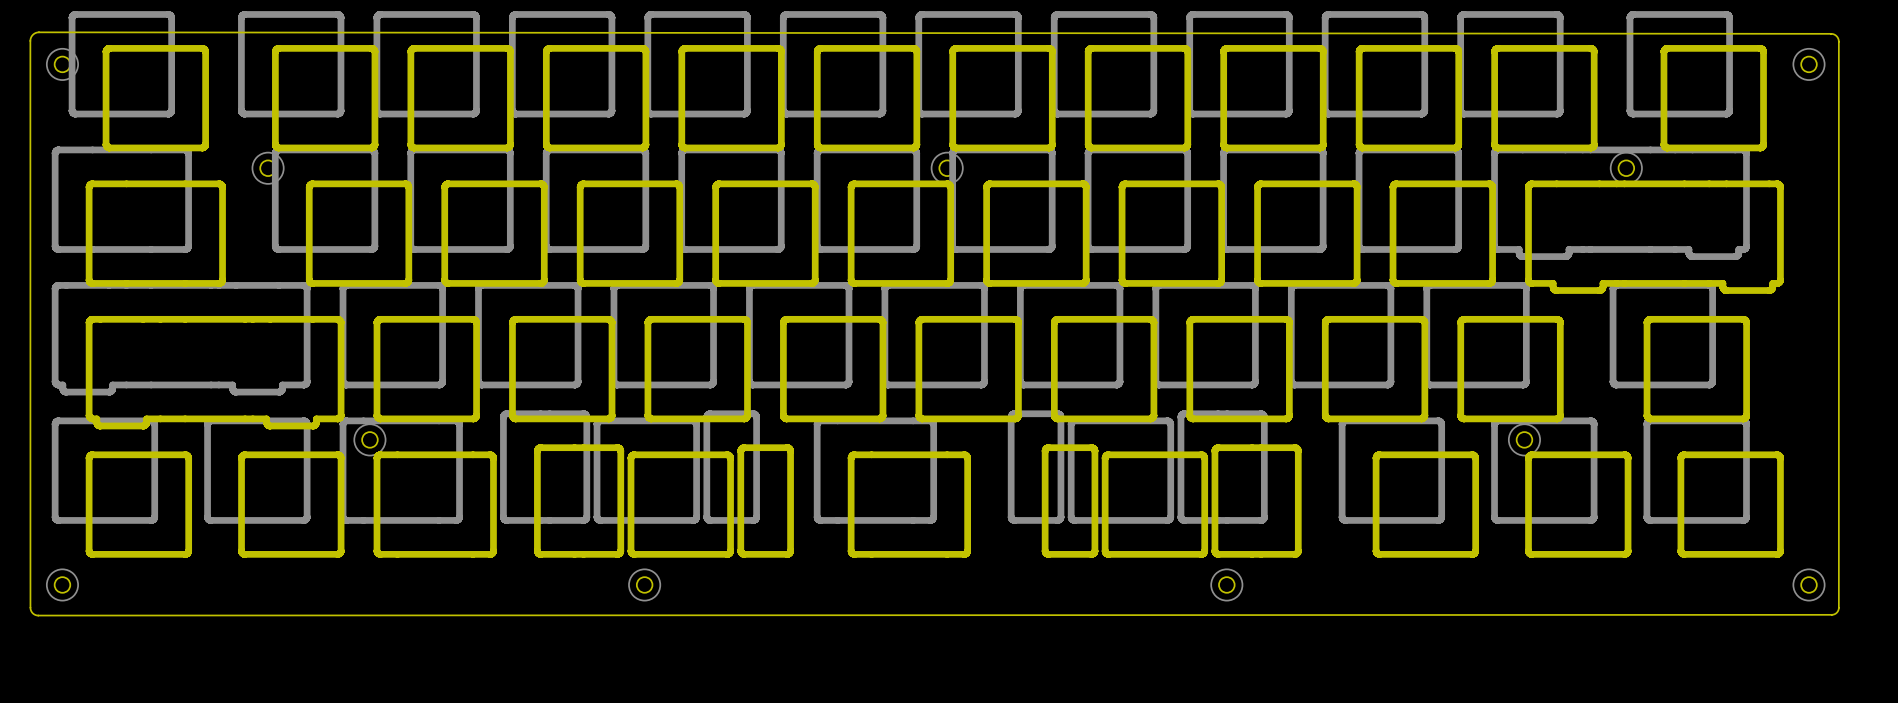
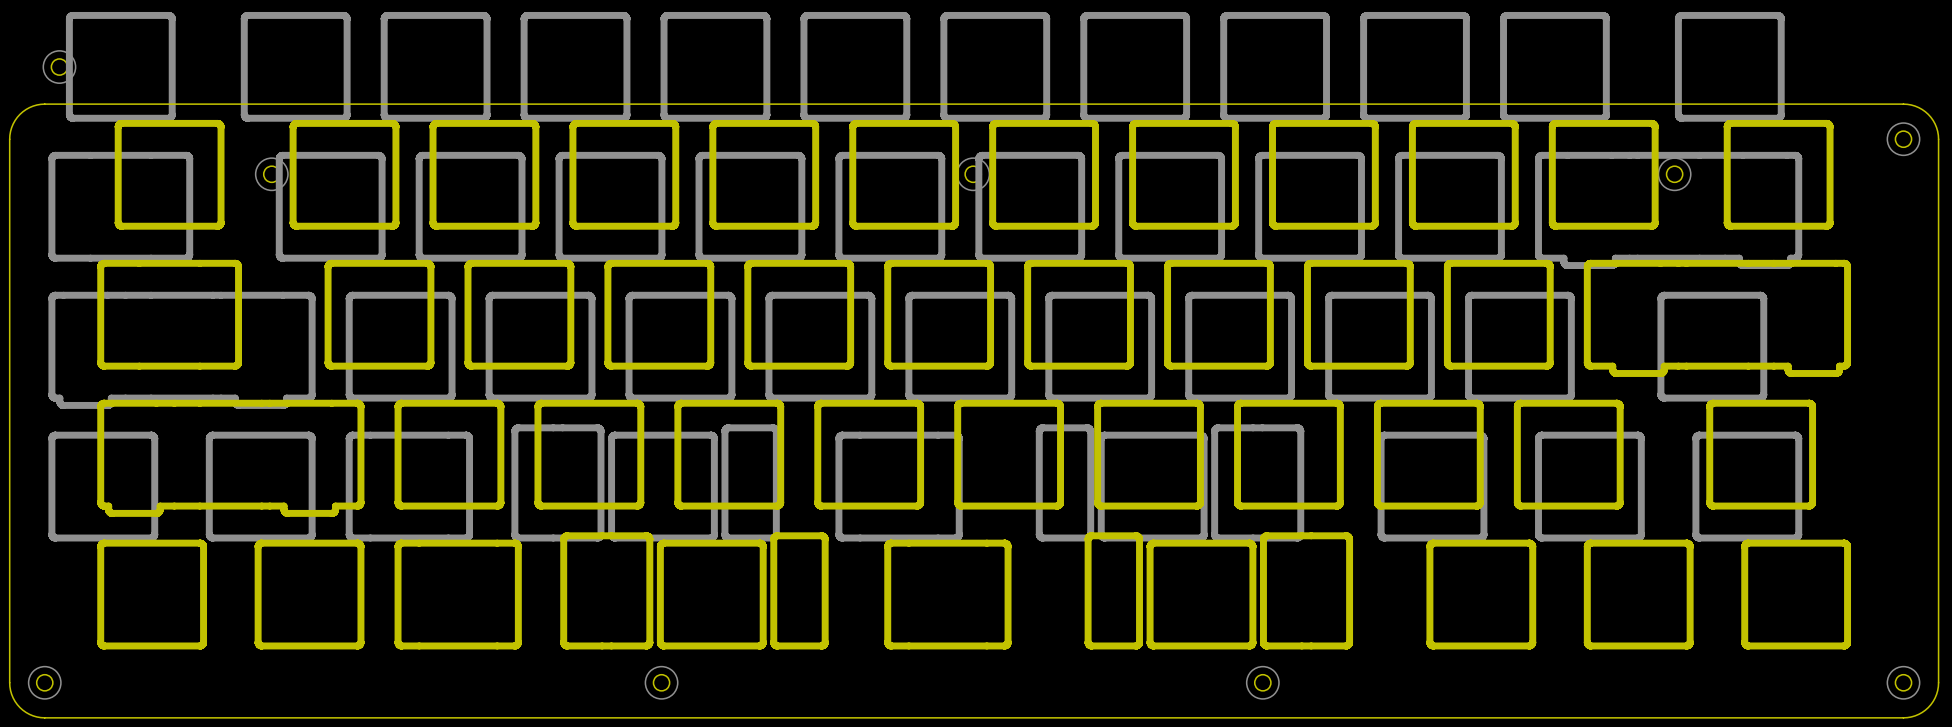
board edge: (38, 32) (1833, 34) (1837, 36) (1838, 41) (1838, 610) (1831, 614) (36, 615) (32, 612) (30, 607) (30, 40) (32, 34) (38, 32) -> (44, 104) (33, 106) (19, 114) (11, 127) (9, 139) (9, 682) (15, 701) (22, 710) (33, 715) (44, 717) (1903, 717) (1922, 712) (1930, 704) (1936, 694) (1938, 682) (1938, 139) (1936, 127) (1930, 117) (1915, 106) (1903, 104) (44, 104)
board edge: (108, 48) (204, 49) (204, 146) (107, 146) (106, 51) (108, 48) -> none
board edge: (278, 48) (275, 51) (276, 146) (373, 146) (373, 49) (278, 48) -> none
board edge: (413, 48) (509, 49) (509, 146) (411, 146) (410, 51) (413, 48) -> none
board edge: (549, 48) (644, 49) (644, 146) (547, 146) (546, 51) (549, 48) -> none
board edge: (684, 48) (780, 49) (780, 146) (682, 146) (681, 51) (684, 48) -> none
board edge: (820, 48) (817, 51) (818, 146) (915, 146) (915, 49) (820, 48) -> none
board edge: (955, 48) (1051, 49) (1051, 146) (953, 146) (952, 51) (955, 48) -> none
board edge: (1091, 48) (1186, 49) (1186, 146) (1089, 146) (1088, 51) (1091, 48) -> none
board edge: (1226, 48) (1223, 51) (1224, 146) (1322, 146) (1322, 49) (1226, 48) -> none
board edge: (1362, 48) (1457, 49) (1457, 146) (1360, 146) (1359, 51) (1362, 48) -> none
board edge: (1497, 48) (1593, 49) (1593, 146) (1495, 146) (1494, 51) (1497, 48) -> none
board edge: (1666, 48) (1663, 51) (1665, 146) (1762, 146) (1762, 49) (1666, 48) -> none
part position: (1809, 64) -> (1903, 139)
board edge: none -> (121, 123) (219, 124) (219, 225) (119, 225) (118, 126) (121, 123)
board edge: none -> (296, 123) (394, 124) (394, 225) (294, 225) (293, 126) (296, 123)
board edge: none -> (436, 123) (534, 124) (534, 225) (434, 225) (433, 126) (436, 123)
board edge: none -> (576, 123) (572, 126) (574, 225) (674, 225) (674, 124) (576, 123)
board edge: none -> (716, 123) (814, 124) (814, 225) (713, 225) (712, 126) (716, 123)
board edge: none -> (856, 123) (954, 124) (954, 225) (853, 225) (852, 126) (856, 123)
board edge: none -> (996, 123) (1094, 124) (1094, 225) (993, 225) (992, 126) (996, 123)
board edge: none -> (1136, 123) (1234, 124) (1234, 225) (1133, 225) (1132, 126) (1136, 123)
board edge: none -> (1276, 123) (1374, 124) (1374, 225) (1273, 225) (1272, 126) (1276, 123)
board edge: none -> (1416, 123) (1514, 124) (1514, 225) (1413, 225) (1412, 126) (1416, 123)
board edge: none -> (1556, 123) (1654, 124) (1654, 225) (1553, 225) (1552, 126) (1556, 123)
board edge: none -> (1730, 123) (1828, 124) (1828, 225) (1728, 225) (1727, 126) (1730, 123)
board edge: (92, 183) (221, 184) (221, 281) (90, 282) (89, 187) (92, 183) -> (104, 263) (237, 264) (237, 364) (102, 365) (100, 266) (104, 263)
board edge: (312, 183) (407, 184) (407, 282) (310, 282) (309, 187) (312, 183) -> (331, 263) (429, 264) (429, 365) (329, 365) (328, 266) (331, 263)
board edge: (448, 183) (543, 184) (543, 282) (445, 282) (444, 187) (448, 183) -> (471, 263) (569, 264) (569, 365) (469, 365) (468, 266) (471, 263)
board edge: (583, 183) (678, 184) (678, 282) (581, 282) (580, 187) (583, 183) -> (611, 263) (709, 264) (709, 365) (608, 365) (607, 266) (611, 263)
board edge: (719, 183) (814, 184) (814, 282) (716, 282) (715, 187) (719, 183) -> (751, 263) (849, 264) (849, 365) (748, 365) (747, 266) (751, 263)
board edge: (854, 183) (949, 184) (949, 282) (852, 282) (851, 187) (854, 183) -> (891, 263) (989, 264) (989, 365) (888, 365) (887, 266) (891, 263)
board edge: (990, 183) (1085, 184) (1085, 282) (987, 282) (986, 187) (990, 183) -> (1031, 263) (1129, 264) (1129, 365) (1028, 365) (1027, 266) (1031, 263)
board edge: (1125, 183) (1220, 184) (1220, 282) (1123, 282) (1122, 187) (1125, 183) -> (1171, 263) (1269, 264) (1269, 365) (1168, 365) (1167, 266) (1171, 263)
board edge: (1261, 183) (1356, 184) (1356, 282) (1258, 282) (1257, 187) (1261, 183) -> (1311, 263) (1409, 264) (1409, 365) (1308, 365) (1307, 266) (1311, 263)
board edge: (1396, 183) (1393, 187) (1394, 282) (1491, 282) (1491, 184) (1396, 183) -> (1451, 263) (1447, 266) (1448, 365) (1549, 365) (1549, 264) (1451, 263)
board edge: (1532, 183) (1778, 184) (1780, 187) (1780, 281) (1772, 283) (1772, 288) (1769, 290) (1725, 290) (1723, 288) (1722, 283) (1602, 283) (1602, 288) (1599, 290) (1556, 290) (1553, 288) (1553, 283) (1530, 283) (1528, 279) (1528, 187) (1532, 183) -> (1590, 263) (1845, 263) (1847, 266) (1847, 363) (1839, 366) (1839, 371) (1835, 373) (1791, 373) (1788, 371) (1788, 366) (1664, 366) (1663, 371) (1661, 373) (1616, 373) (1613, 371) (1612, 366) (1589, 365) (1587, 362) (1587, 266) (1590, 263)
board edge: (92, 319) (338, 319) (341, 322) (340, 416) (337, 418) (316, 418) (316, 423) (313, 425) (269, 425) (266, 423) (266, 418) (146, 418) (146, 423) (143, 425) (99, 425) (96, 418) (91, 418) (89, 415) (89, 322) (92, 319) -> (104, 403) (358, 403) (360, 406) (360, 503) (357, 506) (335, 506) (335, 511) (331, 513) (287, 513) (284, 511) (284, 506) (160, 506) (159, 511) (156, 513) (110, 513) (108, 506) (102, 505) (100, 502) (100, 406) (104, 403)
board edge: (380, 319) (475, 320) (475, 417) (378, 417) (377, 322) (380, 319) -> (401, 403) (499, 404) (499, 504) (399, 504) (398, 406) (401, 403)
board edge: (516, 319) (610, 320) (610, 417) (513, 417) (512, 322) (516, 319) -> (541, 403) (639, 404) (639, 504) (539, 504) (537, 406) (541, 403)
board edge: (651, 319) (746, 320) (746, 417) (648, 417) (647, 322) (651, 319) -> (681, 403) (779, 404) (779, 504) (678, 504) (677, 406) (681, 403)
board edge: (786, 319) (881, 320) (881, 417) (784, 417) (783, 322) (786, 319) -> (821, 403) (919, 404) (919, 504) (818, 504) (817, 406) (821, 403)
board edge: (922, 319) (1017, 320) (1017, 417) (919, 417) (918, 322) (922, 319) -> (961, 403) (1059, 404) (1059, 504) (958, 504) (957, 406) (961, 403)
board edge: (1057, 319) (1152, 320) (1152, 417) (1055, 417) (1054, 322) (1057, 319) -> (1101, 403) (1199, 404) (1199, 504) (1098, 504) (1097, 406) (1101, 403)
board edge: (1193, 319) (1288, 320) (1288, 417) (1190, 417) (1189, 322) (1193, 319) -> (1241, 403) (1339, 404) (1339, 504) (1238, 504) (1237, 406) (1241, 403)
board edge: (1328, 319) (1423, 320) (1423, 417) (1326, 417) (1325, 322) (1328, 319) -> (1381, 403) (1479, 404) (1479, 504) (1378, 504) (1377, 406) (1381, 403)
board edge: (1464, 319) (1559, 320) (1559, 417) (1461, 417) (1460, 322) (1464, 319) -> (1521, 403) (1619, 404) (1619, 504) (1518, 504) (1517, 406) (1521, 403)
board edge: (1650, 319) (1647, 322) (1648, 417) (1745, 417) (1745, 320) (1650, 319) -> (1713, 403) (1709, 406) (1710, 504) (1811, 504) (1811, 404) (1713, 403)
part: (369, 439) -> none
part: (1524, 439) -> none
board edge: (540, 447) (537, 451) (538, 552) (619, 553) (620, 449) (540, 447) -> (566, 535) (563, 539) (564, 644) (648, 645) (649, 537) (566, 535)
board edge: (743, 447) (740, 451) (741, 552) (744, 554) (788, 554) (790, 550) (790, 449) (787, 447) (743, 447) -> (776, 535) (773, 539) (774, 643) (777, 645) (822, 645) (825, 642) (824, 538) (821, 535) (776, 535)
board edge: (1048, 447) (1091, 447) (1094, 449) (1094, 550) (1092, 554) (1048, 554) (1045, 552) (1045, 451) (1048, 447) -> (1091, 535) (1136, 535) (1139, 538) (1139, 642) (1137, 645) (1091, 645) (1088, 643) (1088, 539) (1091, 535)
board edge: (1217, 447) (1297, 449) (1296, 553) (1215, 552) (1214, 451) (1217, 447) -> (1266, 535) (1348, 537) (1348, 645) (1264, 644) (1263, 539) (1266, 535)
board edge: (91, 454) (187, 455) (187, 553) (90, 553) (89, 458) (91, 454) -> (103, 543) (202, 544) (202, 644) (101, 644) (100, 546) (103, 543)
board edge: (244, 454) (340, 455) (340, 553) (242, 553) (241, 458) (244, 454) -> (261, 543) (359, 544) (359, 644) (259, 644) (258, 546) (261, 543)
board edge: (379, 454) (376, 458) (378, 553) (492, 553) (492, 455) (379, 454) -> (400, 543) (398, 546) (399, 645) (517, 644) (517, 544) (400, 543)
board edge: (633, 454) (631, 458) (632, 553) (729, 553) (729, 455) (633, 454) -> (663, 543) (660, 546) (661, 644) (762, 644) (762, 544) (663, 543)
board edge: (854, 454) (851, 458) (852, 553) (966, 553) (966, 455) (854, 454) -> (890, 543) (887, 546) (888, 645) (1007, 644) (1006, 544) (890, 543)
board edge: (1108, 454) (1105, 458) (1106, 553) (1203, 553) (1203, 455) (1108, 454) -> (1153, 543) (1150, 546) (1151, 644) (1251, 644) (1251, 544) (1153, 543)
board edge: (1378, 454) (1474, 455) (1474, 553) (1377, 553) (1376, 458) (1378, 454) -> (1432, 543) (1531, 544) (1531, 644) (1430, 644) (1429, 546) (1432, 543)
board edge: (1531, 454) (1627, 455) (1627, 553) (1529, 553) (1528, 458) (1531, 454) -> (1590, 543) (1689, 544) (1689, 644) (1588, 644) (1587, 546) (1590, 543)
board edge: (1683, 454) (1779, 455) (1779, 553) (1681, 553) (1680, 458) (1683, 454) -> (1747, 543) (1846, 544) (1846, 644) (1745, 644) (1744, 546) (1747, 543)
part position: (62, 584) -> (44, 682)
part position: (644, 584) -> (661, 682)
part position: (1226, 584) -> (1262, 682)
part position: (1809, 584) -> (1903, 682)

